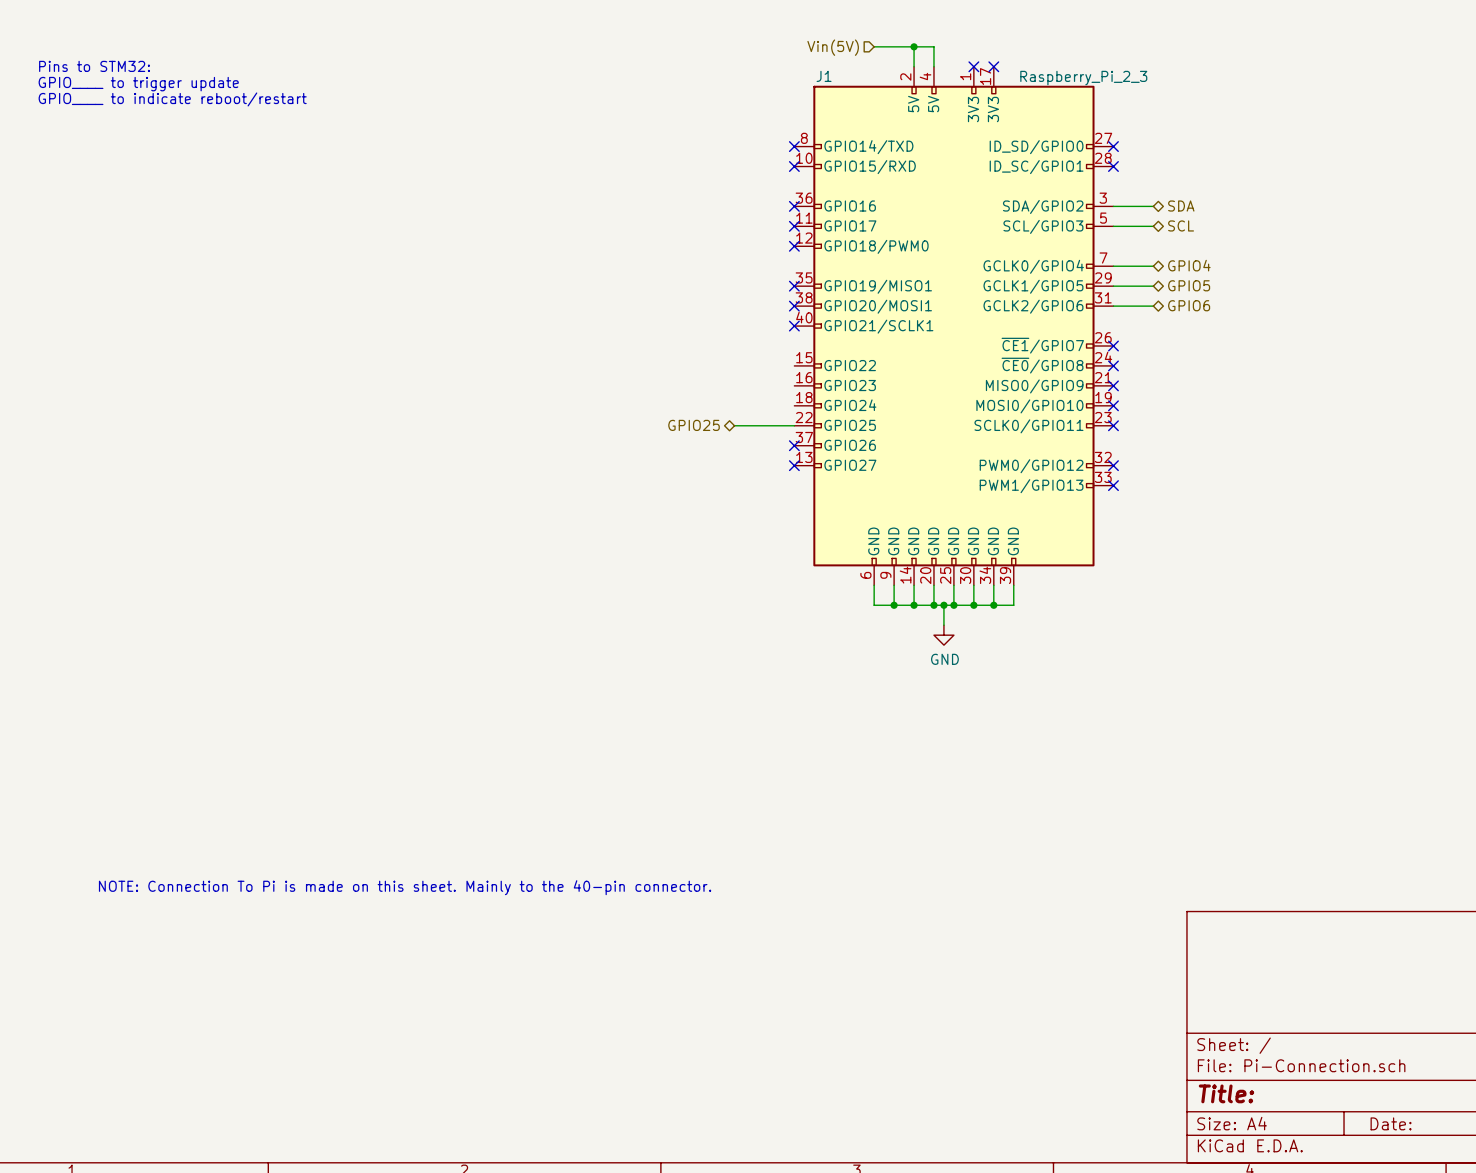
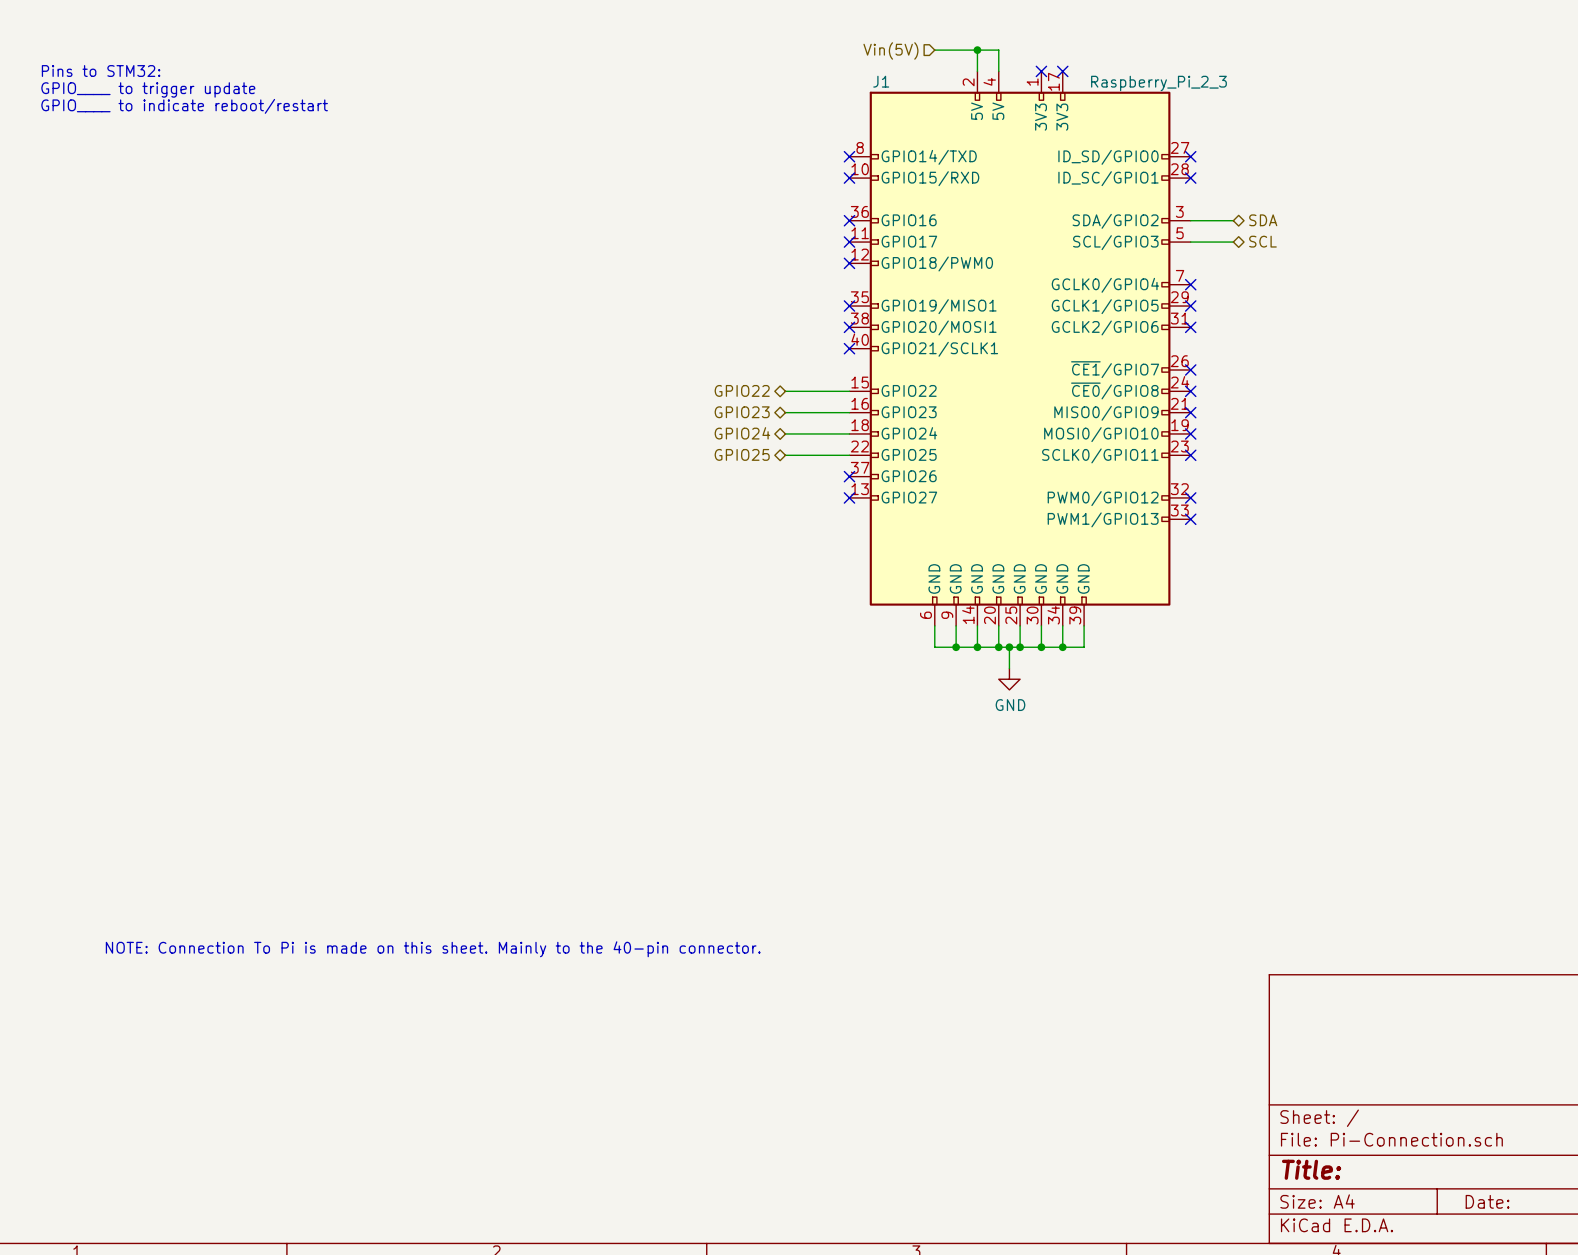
hierarchical label: GPIO4 (1189, 265) -> none
wire: (1113, 266) (1153, 266) -> none
no-connect mark: none -> (1190, 284)
hierarchical label: GPIO5 (1189, 285) -> none
wire: (1113, 286) (1153, 286) -> none
no-connect mark: none -> (1190, 306)
hierarchical label: GPIO6 (1189, 305) -> none
wire: (1113, 306) (1153, 306) -> none
no-connect mark: none -> (1190, 327)
hierarchical label: none -> GPIO22 (742, 390)
wire: none -> (785, 391) (849, 391)
hierarchical label: none -> GPIO23 (742, 412)
wire: none -> (785, 412) (849, 412)
hierarchical label: none -> GPIO24 (742, 433)
wire: none -> (785, 433) (849, 433)

